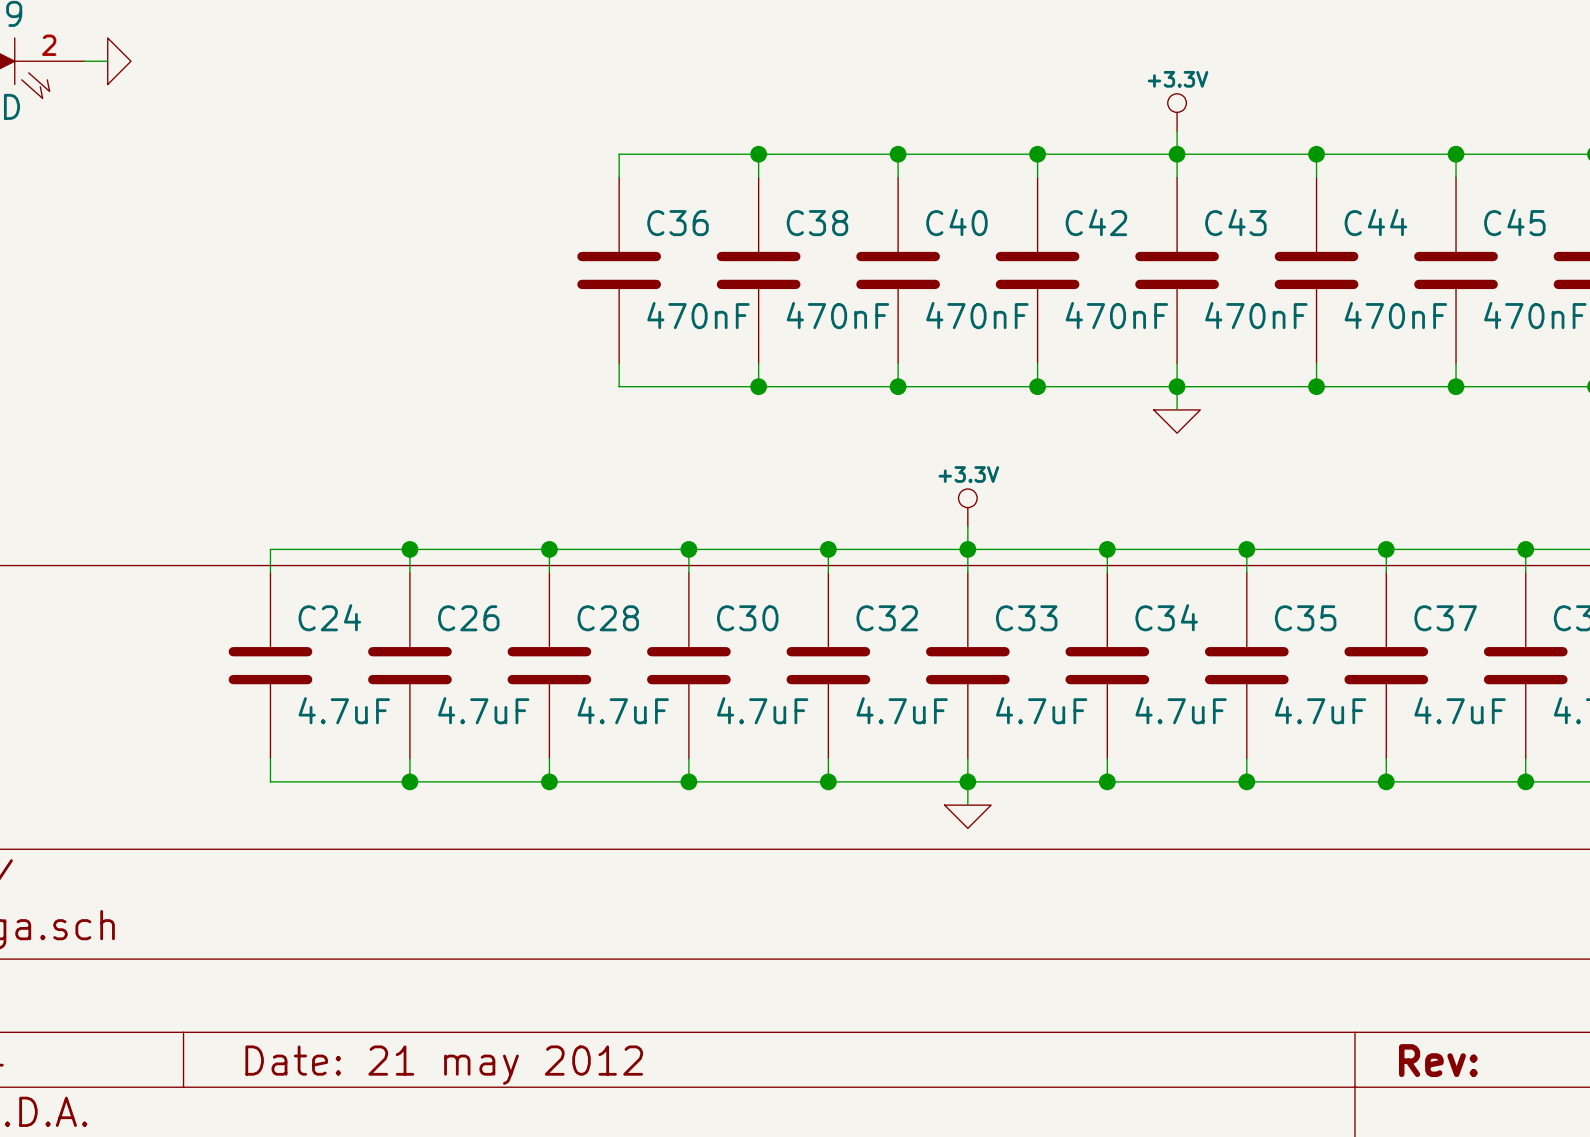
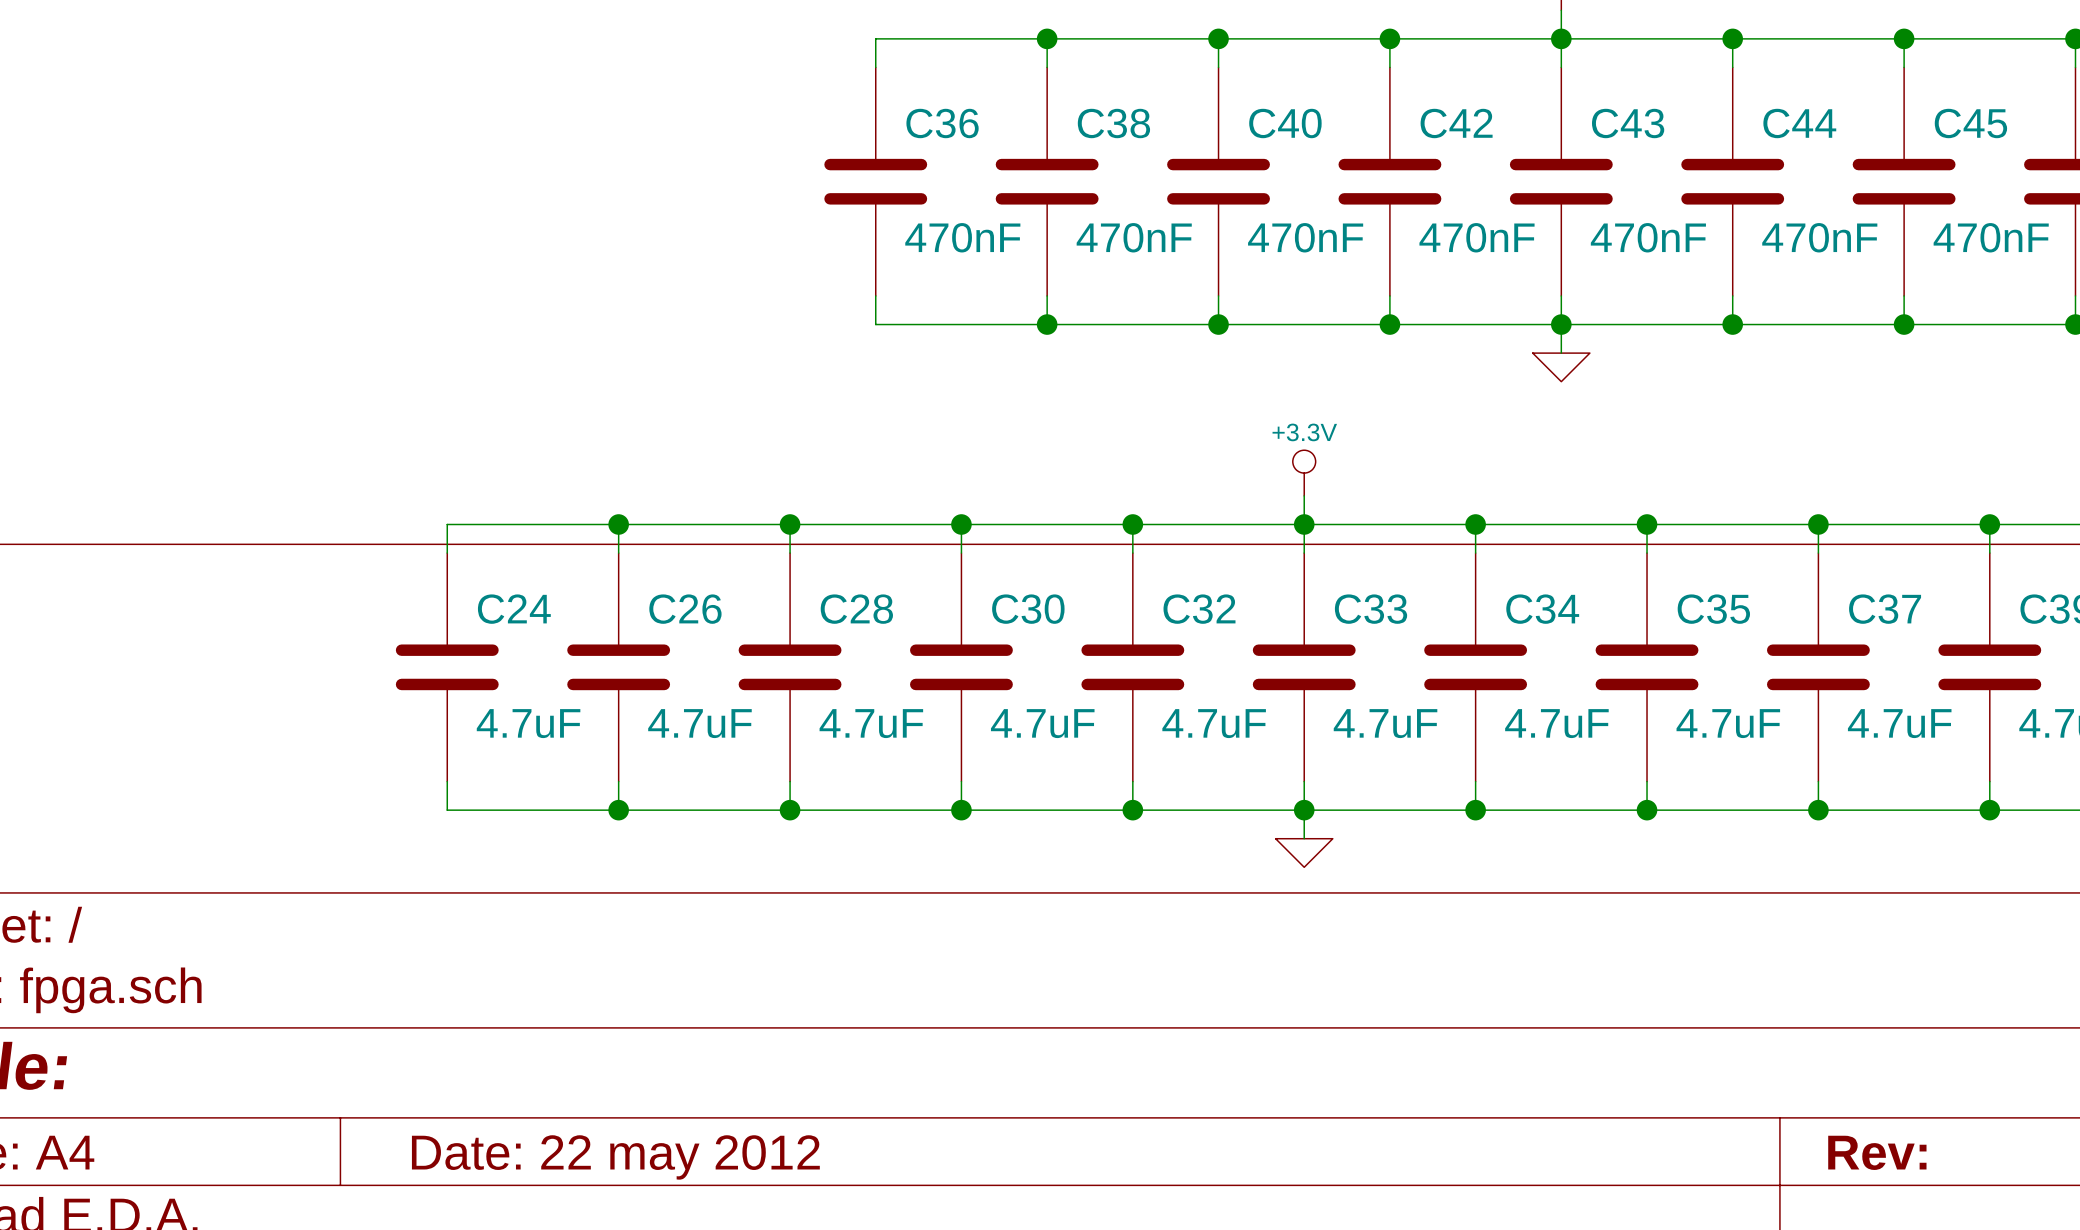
title block: Date: 21 may 2012 (444, 1065) -> Date: 22 may 2012 (615, 1157)

